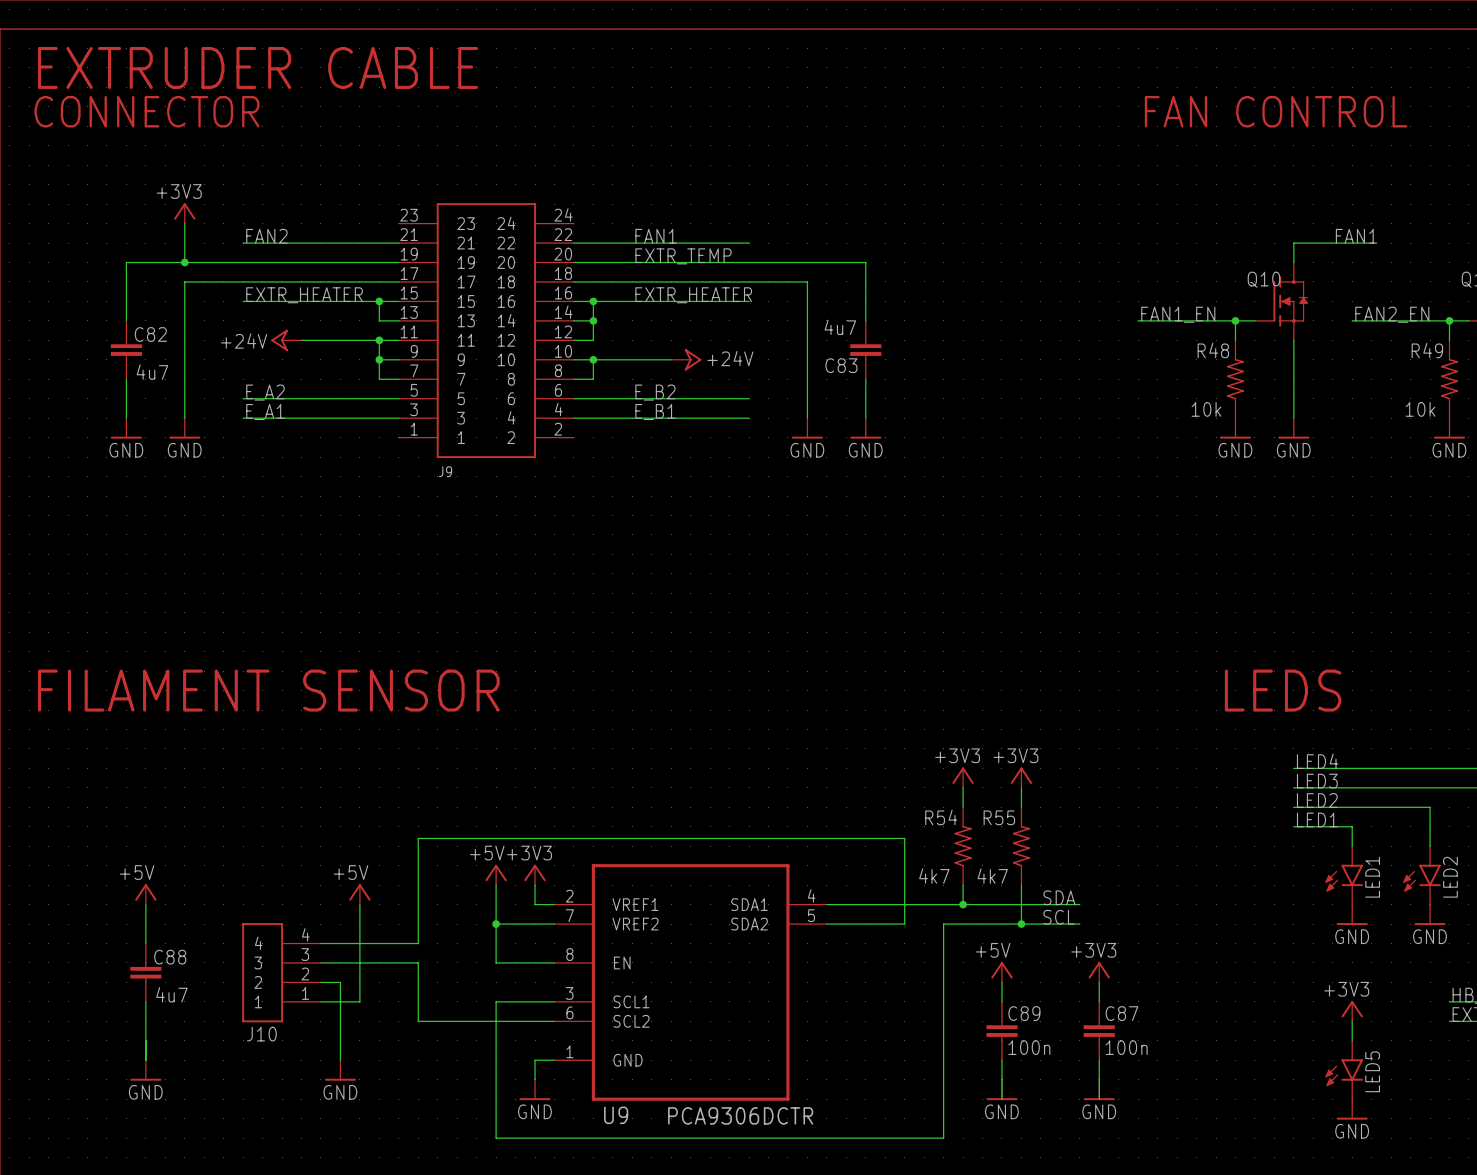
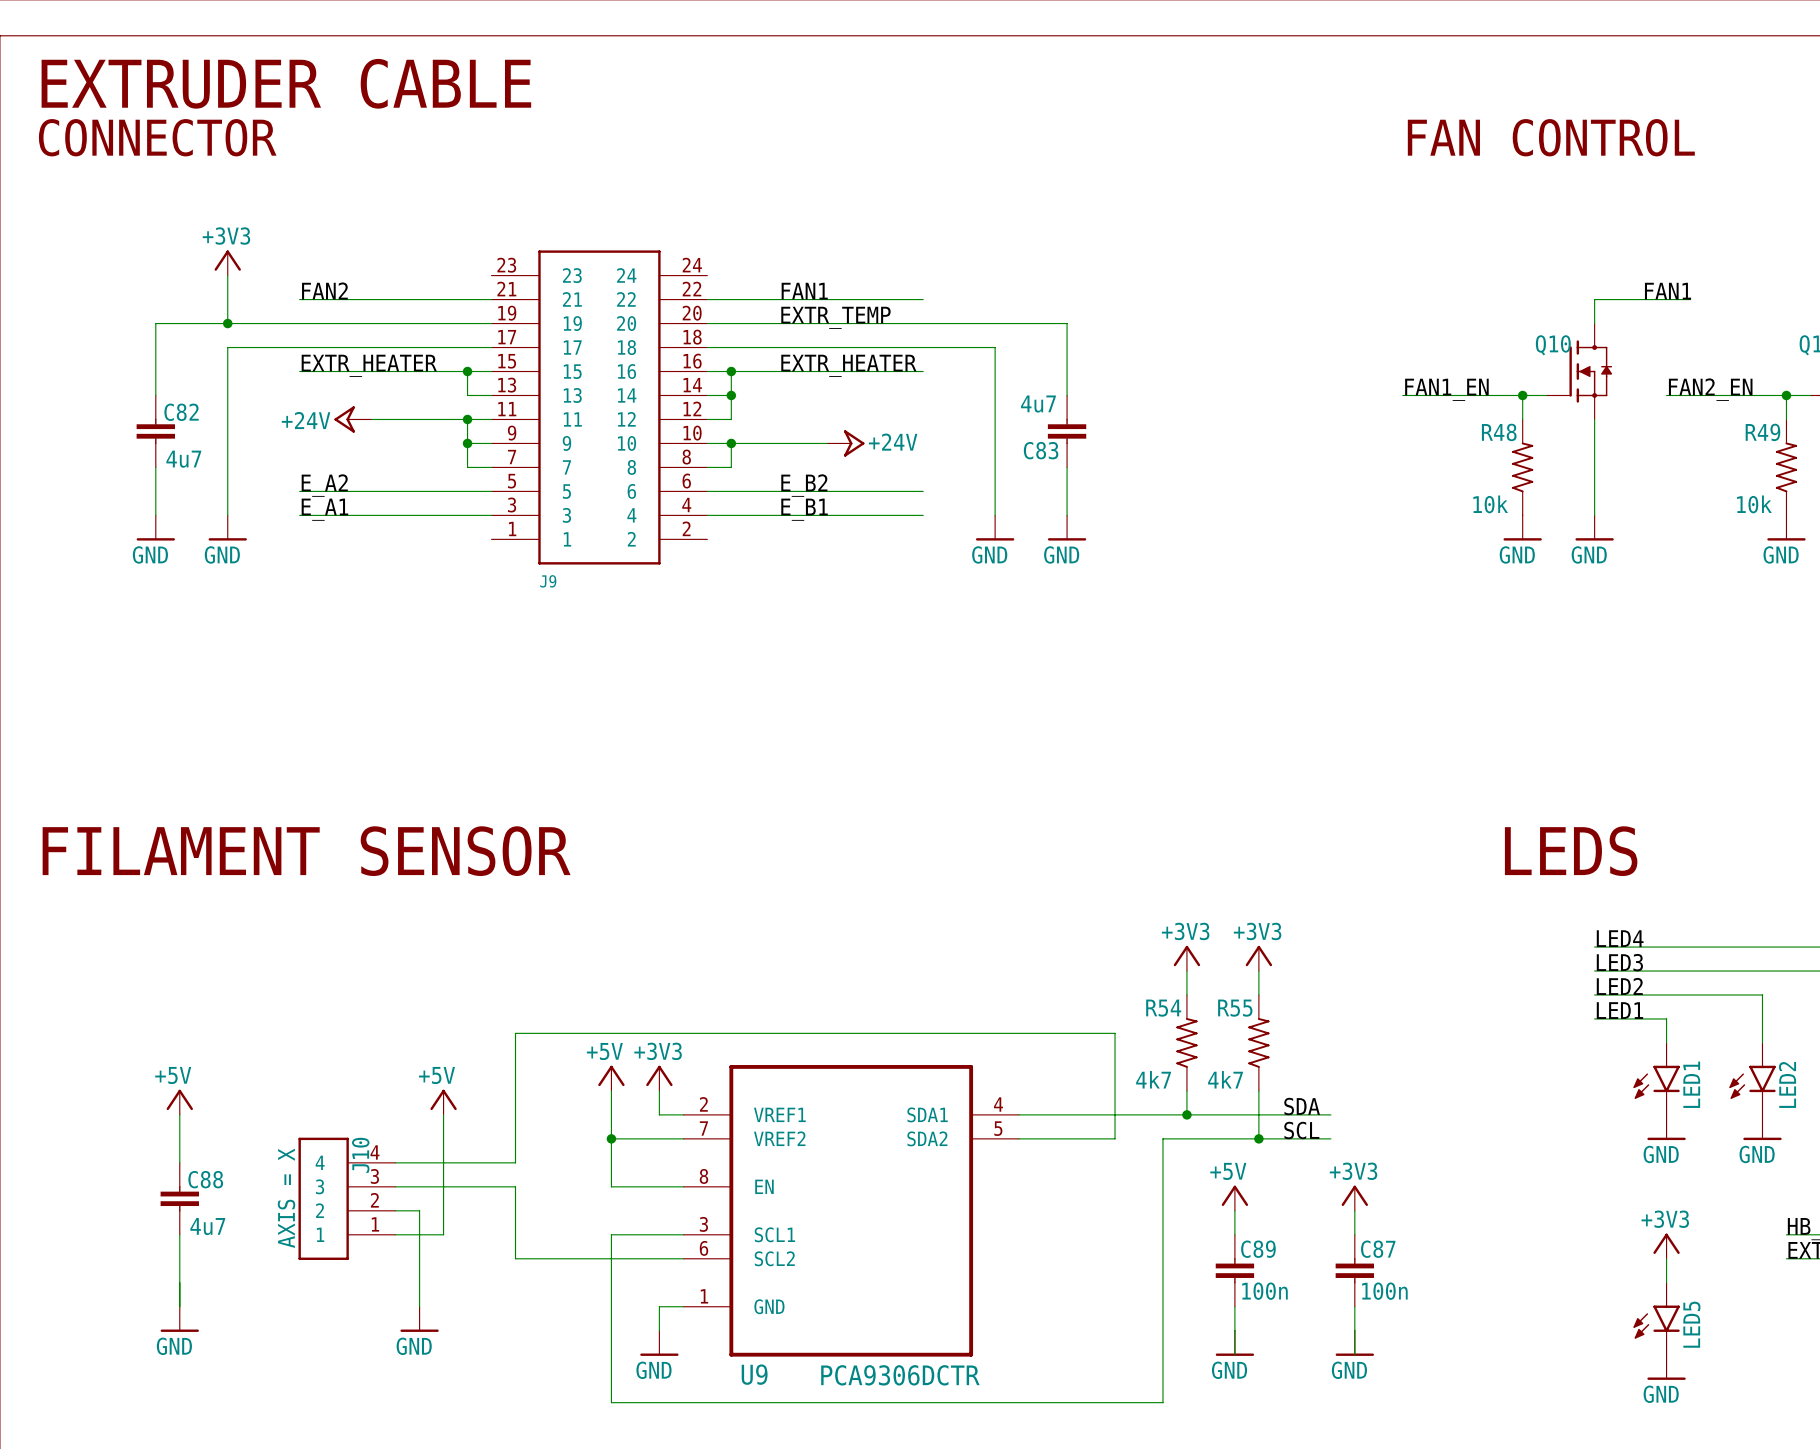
J10 text: none -> AXIS = X (286, 1198)
J10 name rotation: 0° (261, 1034) -> 90° counterclockwise (360, 1155)
J10 name position: J10 (261, 1034) -> J10 (360, 1155)

